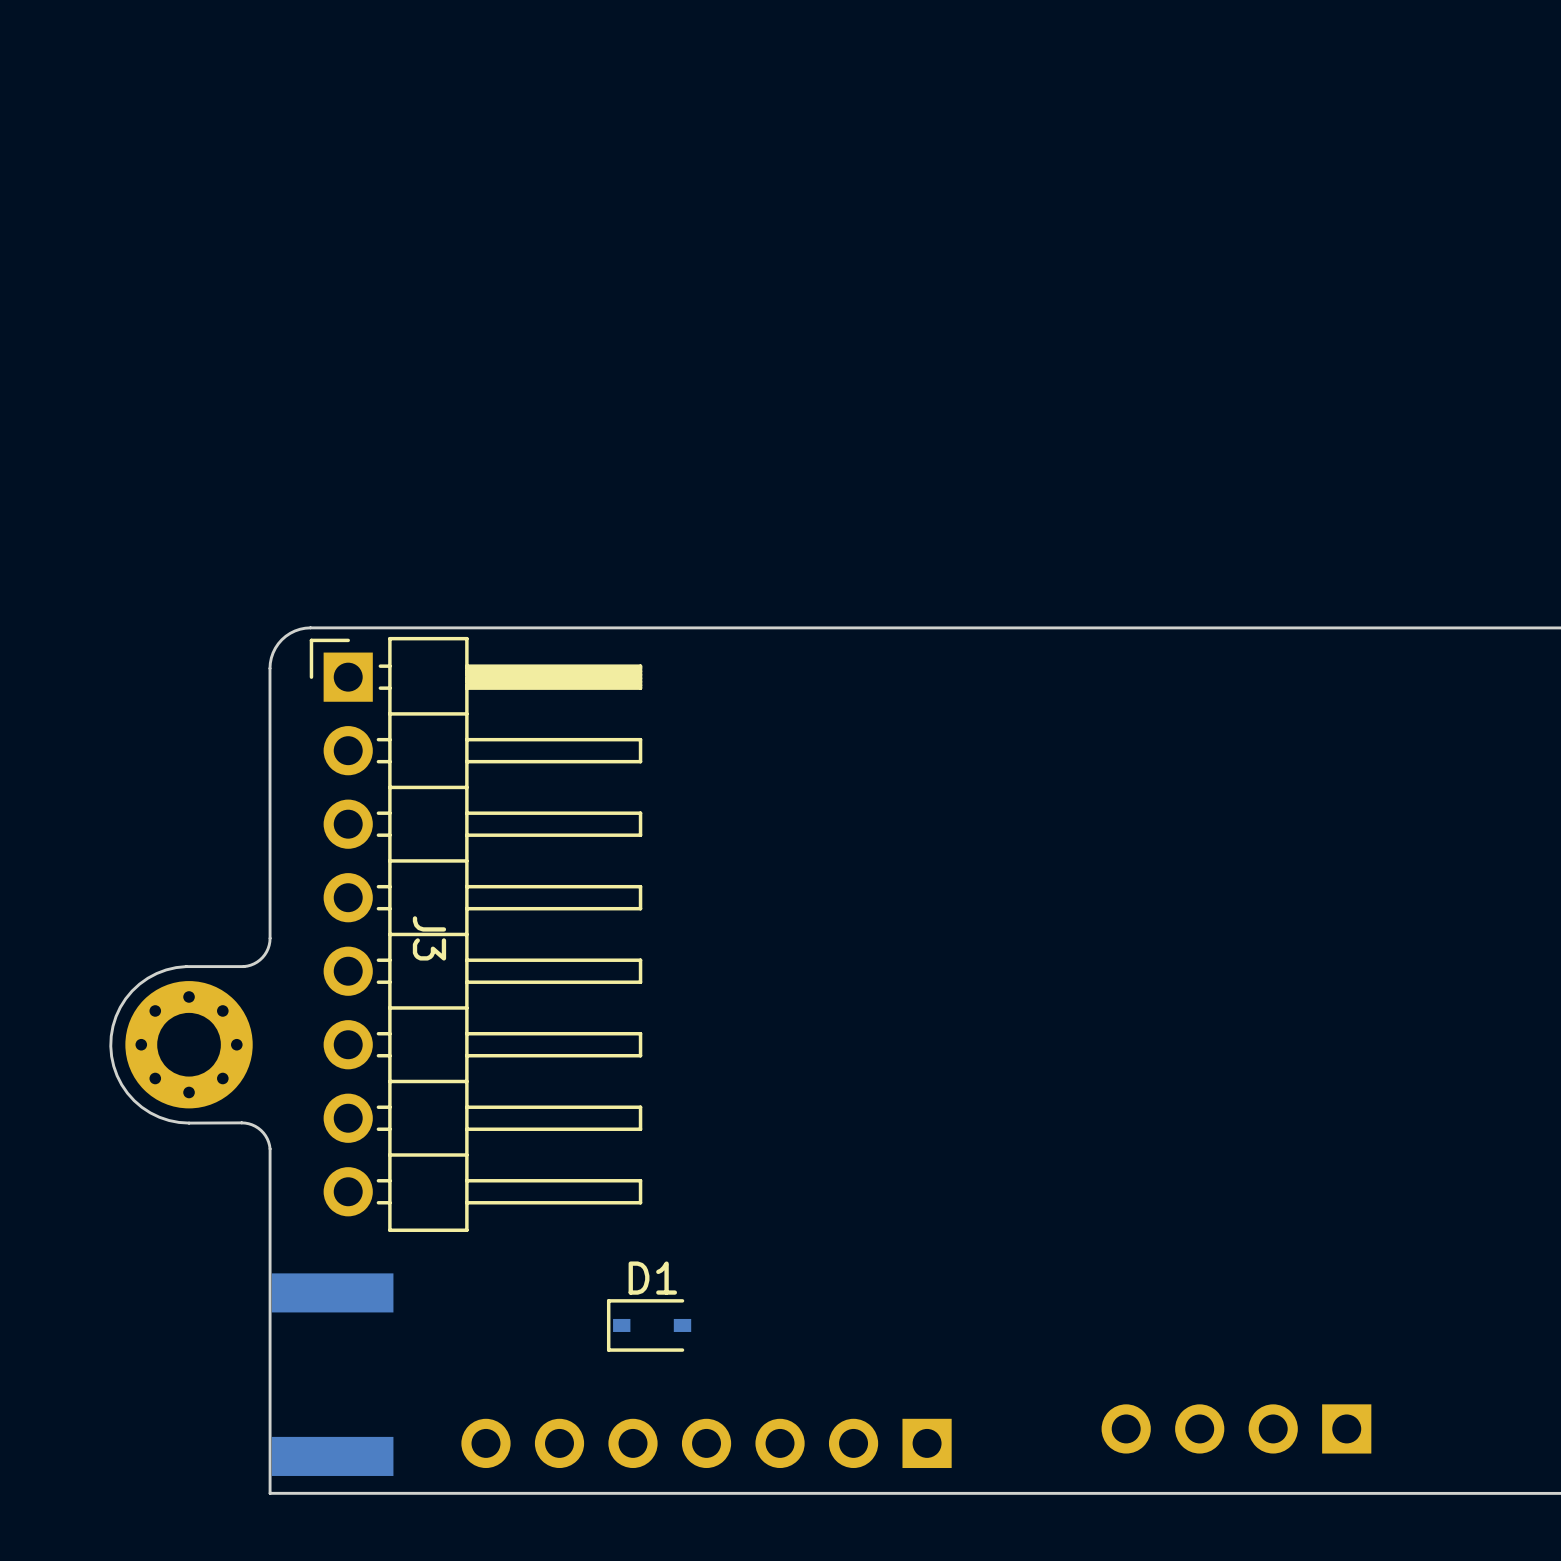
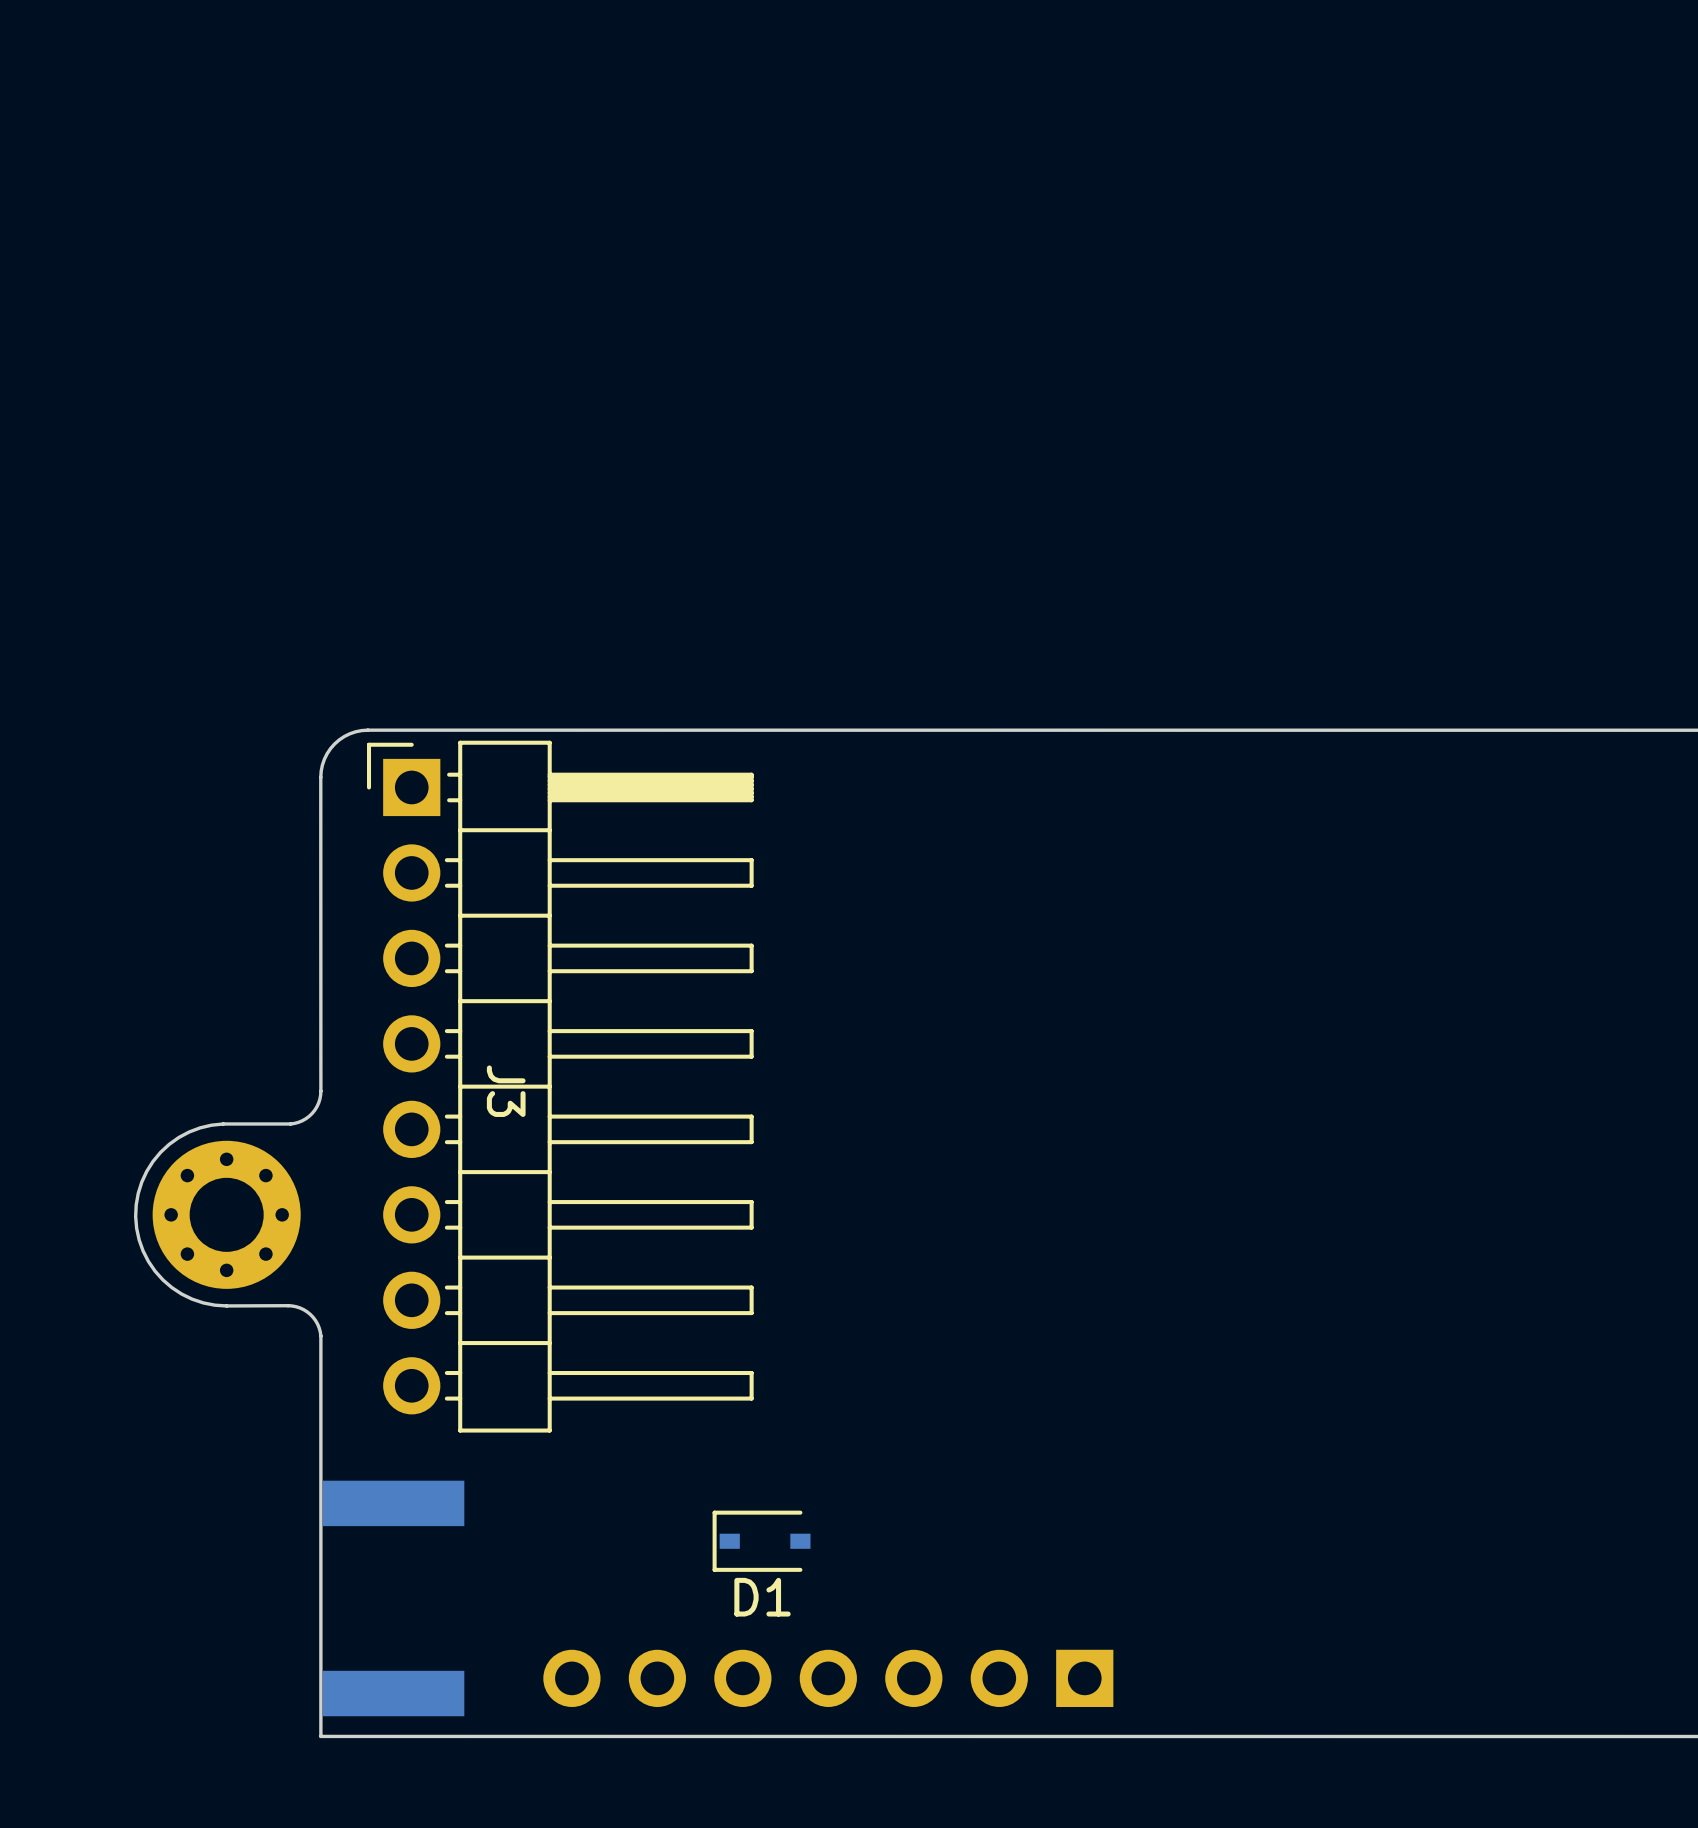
D1 name position: D1 (652, 1278) -> D1 (762, 1597)
part: (1236, 1428) -> none

